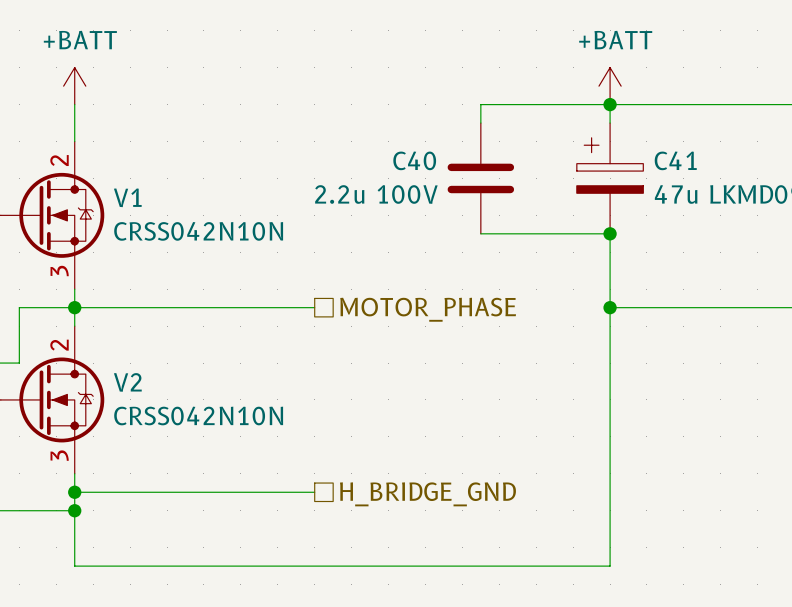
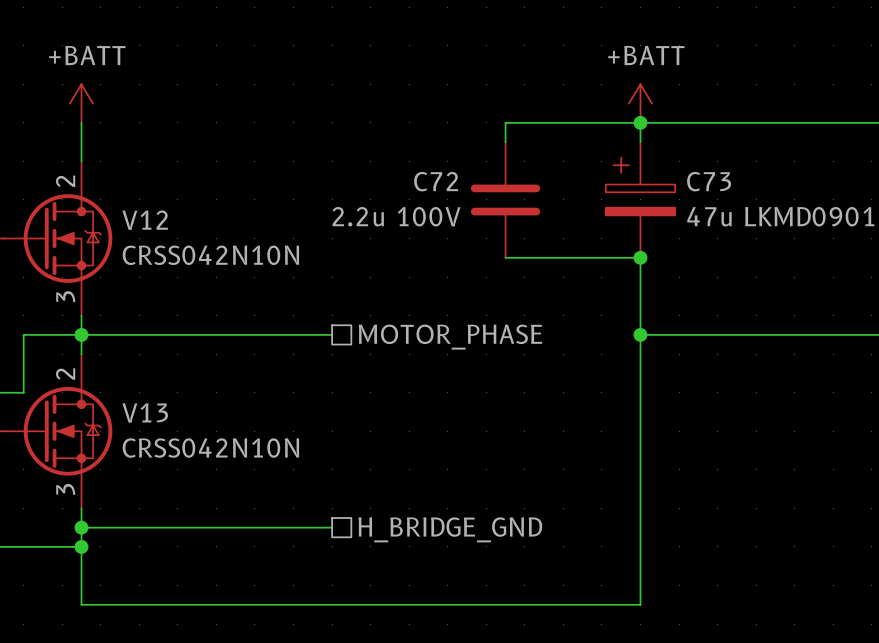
C40 name: C40 (414, 160) -> C72 (436, 181)
C41 name: C41 (675, 160) -> C73 (709, 181)
V1 name: V1 (127, 197) -> V12 (145, 220)
V2 name: V2 (127, 382) -> V13 (145, 412)

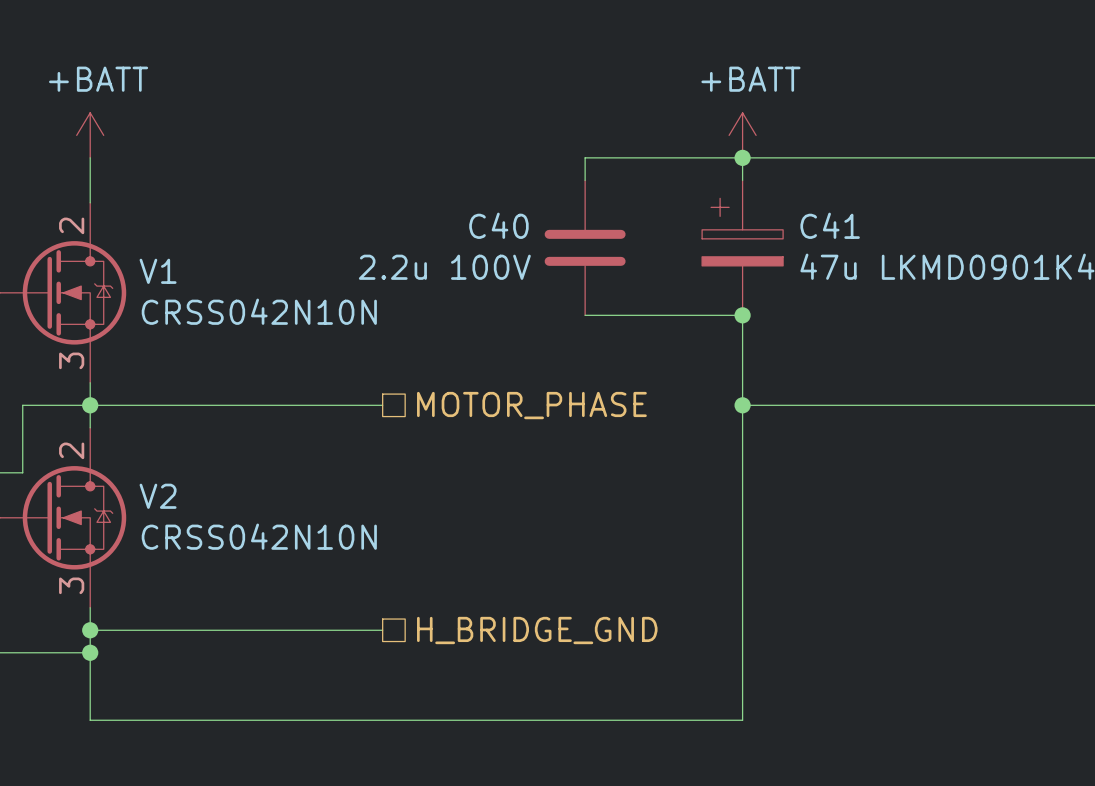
C72 name: C72 (436, 181) -> C40 (498, 225)
C73 name: C73 (709, 181) -> C41 (830, 225)
V12 name: V12 (145, 220) -> V1 (158, 271)
V13 name: V13 (145, 412) -> V2 (158, 496)

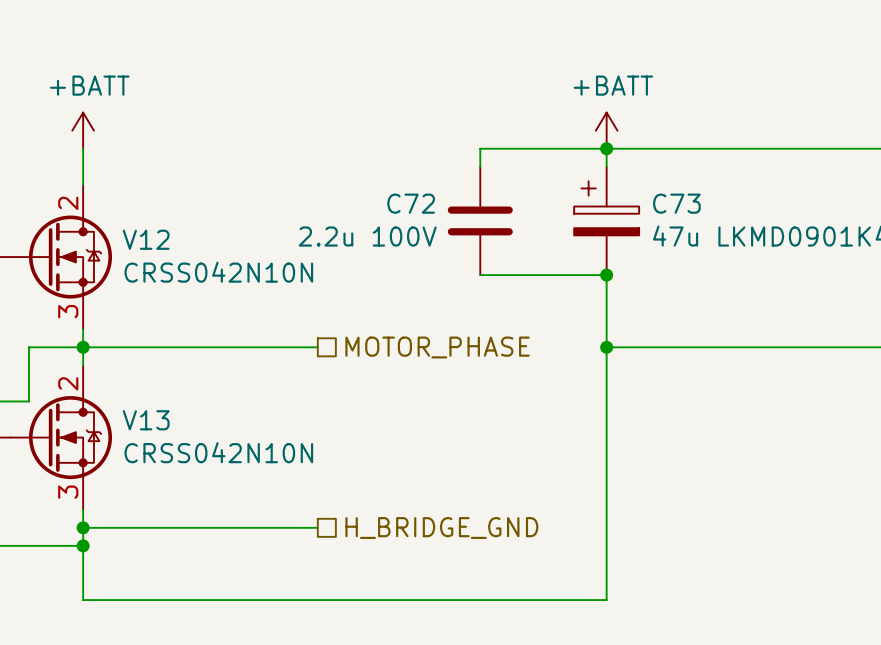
C40 name: C40 (498, 225) -> C72 (411, 203)
C41 name: C41 (830, 225) -> C73 (676, 203)
V1 name: V1 (158, 271) -> V12 (146, 239)
V2 name: V2 (158, 496) -> V13 (146, 420)

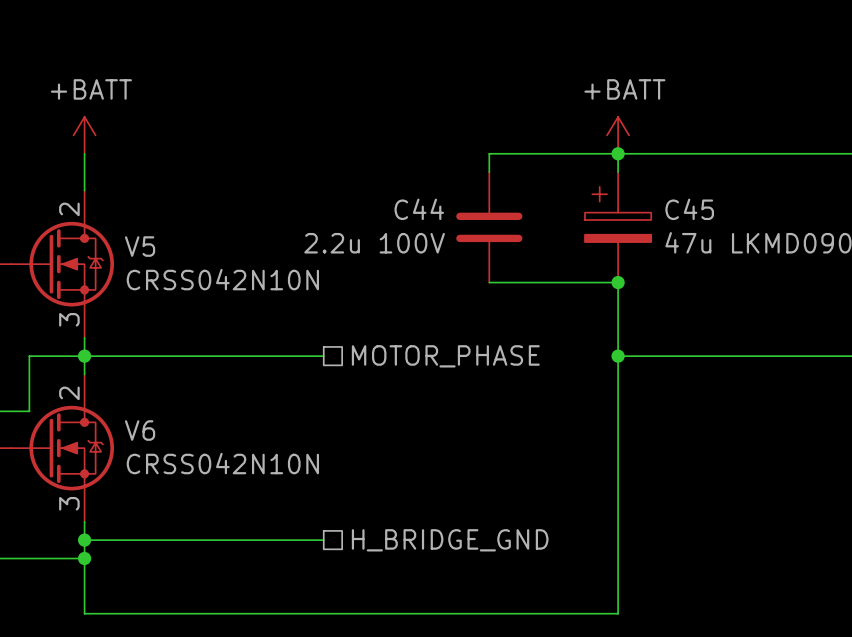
C72 name: C72 (411, 203) -> C44 (419, 209)
C73 name: C73 (676, 203) -> C45 (689, 209)
V12 name: V12 (146, 239) -> V5 (140, 246)
V13 name: V13 (146, 420) -> V6 (140, 430)

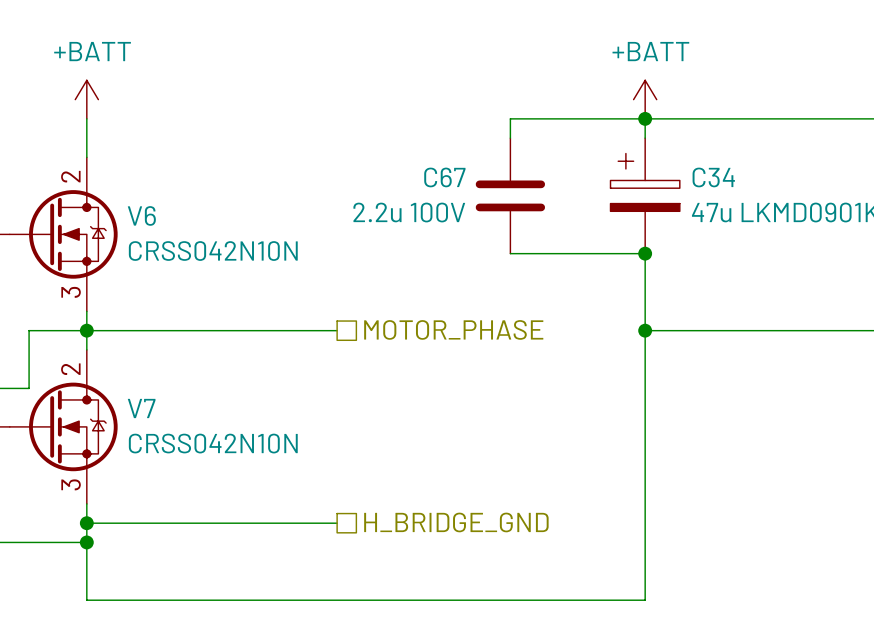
C44 name: C44 (419, 209) -> C67 (444, 177)
C45 name: C45 (689, 209) -> C34 (713, 177)
V5 name: V5 (140, 246) -> V6 (141, 215)
V6 name: V6 (140, 430) -> V7 (141, 408)

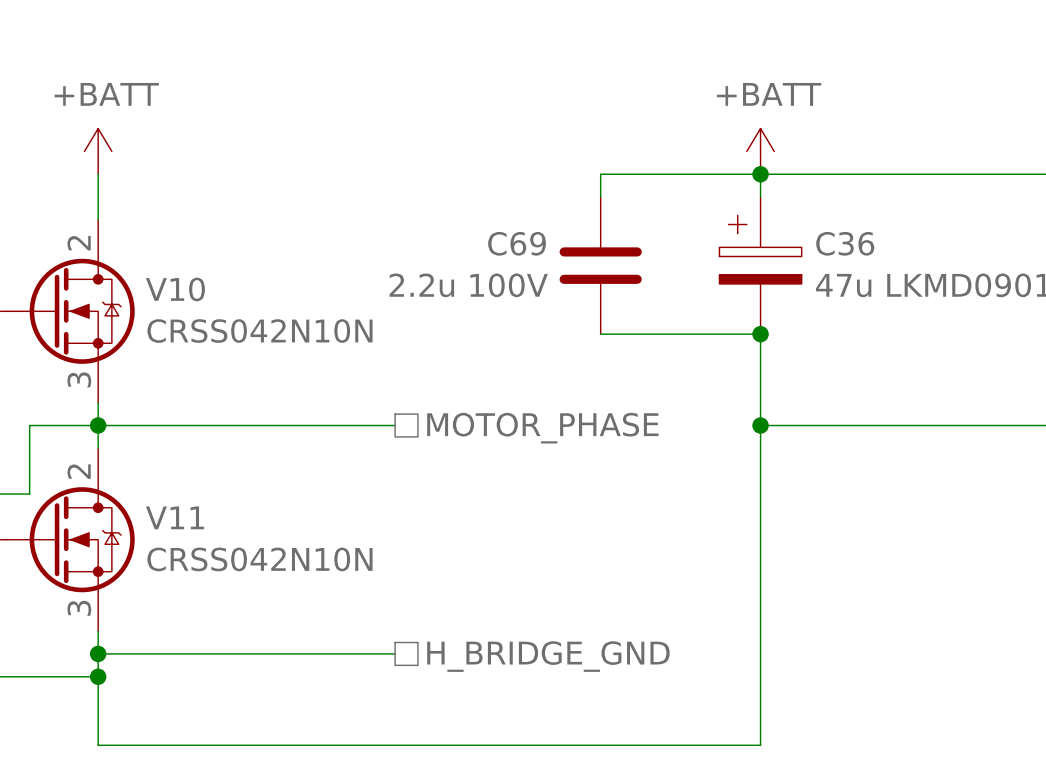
C67 name: C67 (444, 177) -> C69 (517, 243)
C34 name: C34 (713, 177) -> C36 (845, 243)
V6 name: V6 (141, 215) -> V10 (175, 289)
V7 name: V7 (141, 408) -> V11 (175, 517)

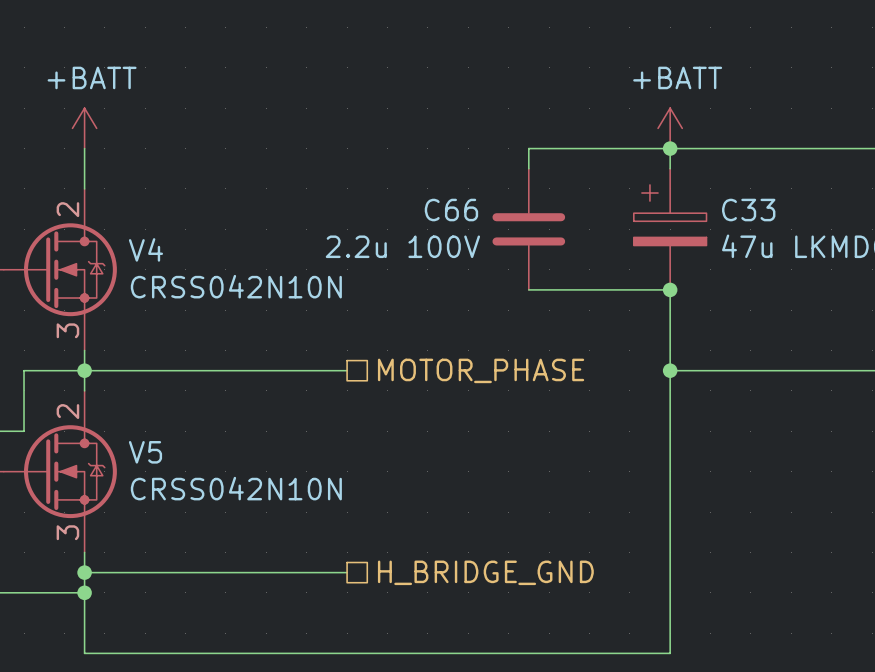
C69 name: C69 (517, 243) -> C66 (451, 210)
C36 name: C36 (845, 243) -> C33 (748, 210)
V10 name: V10 (175, 289) -> V4 (145, 249)
V11 name: V11 (175, 517) -> V5 (145, 452)

